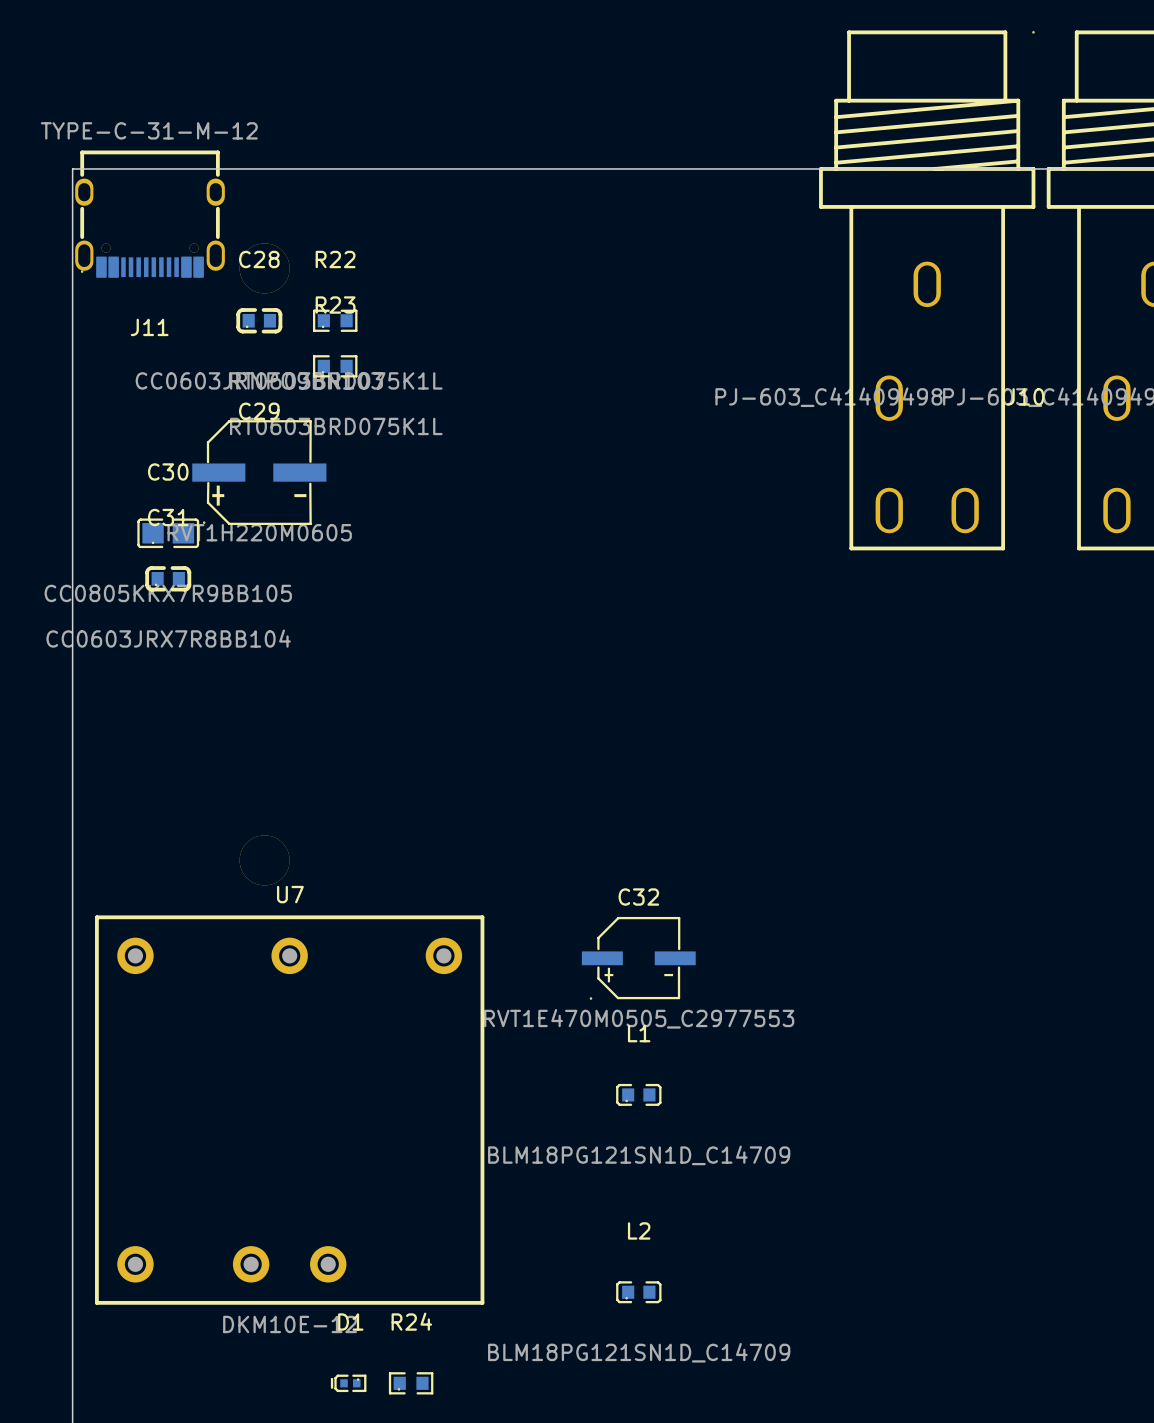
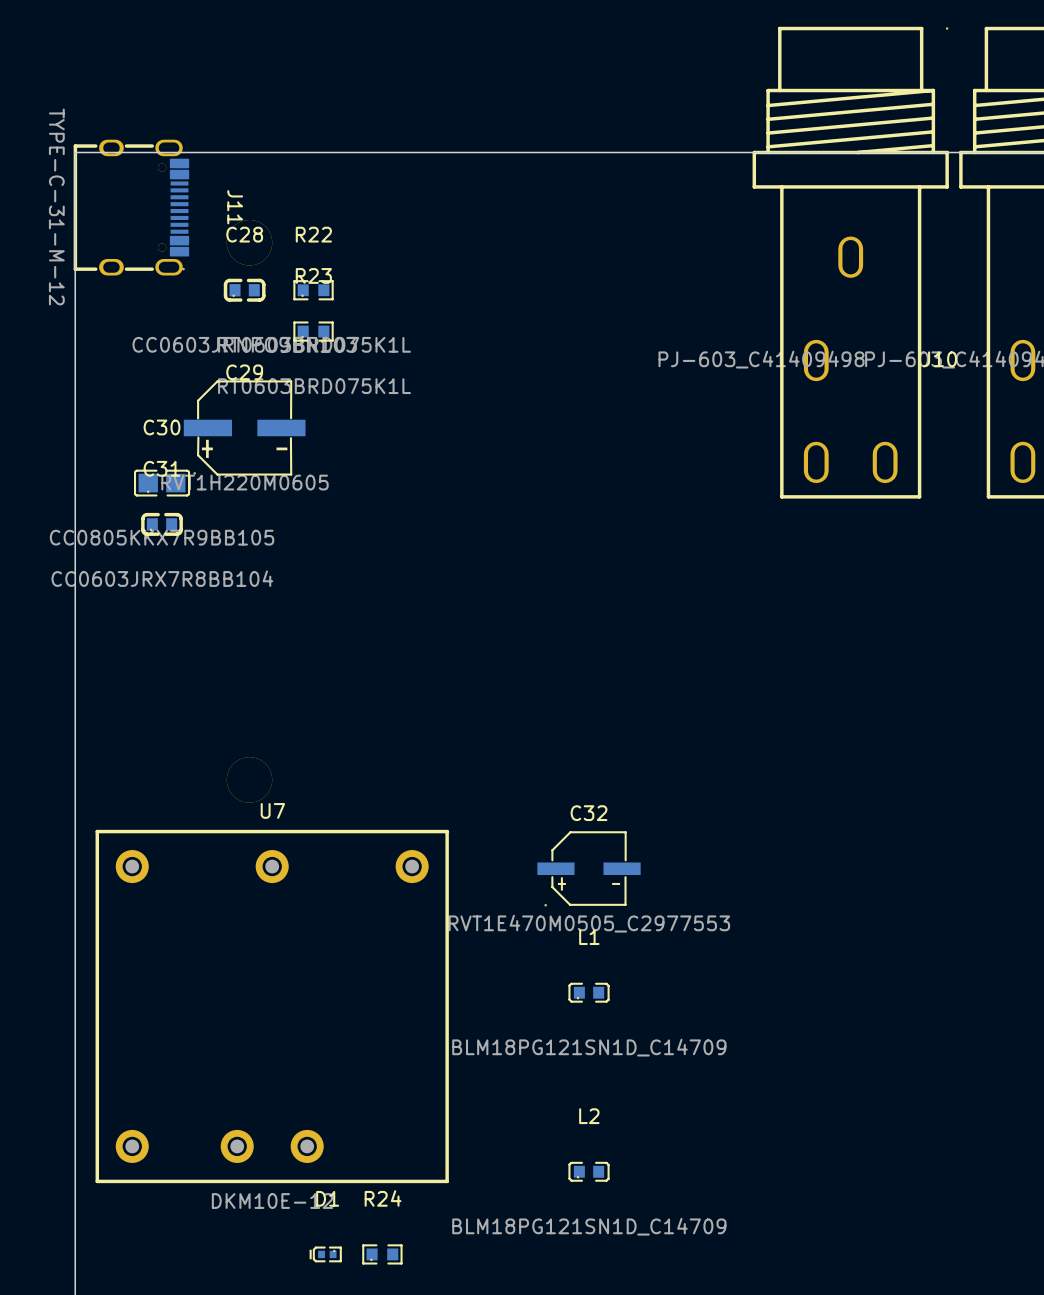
J11 rotation: 0° (150, 214) -> 90° counterclockwise (131, 207)

